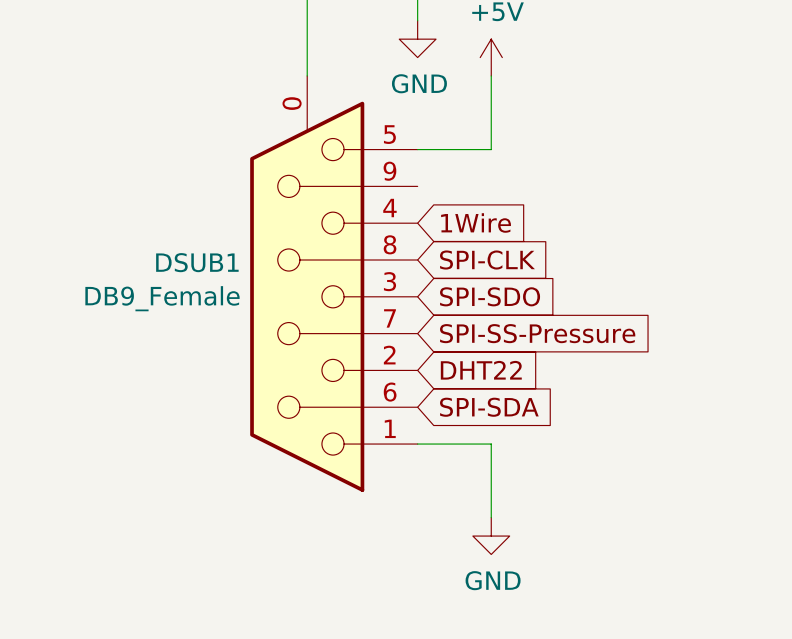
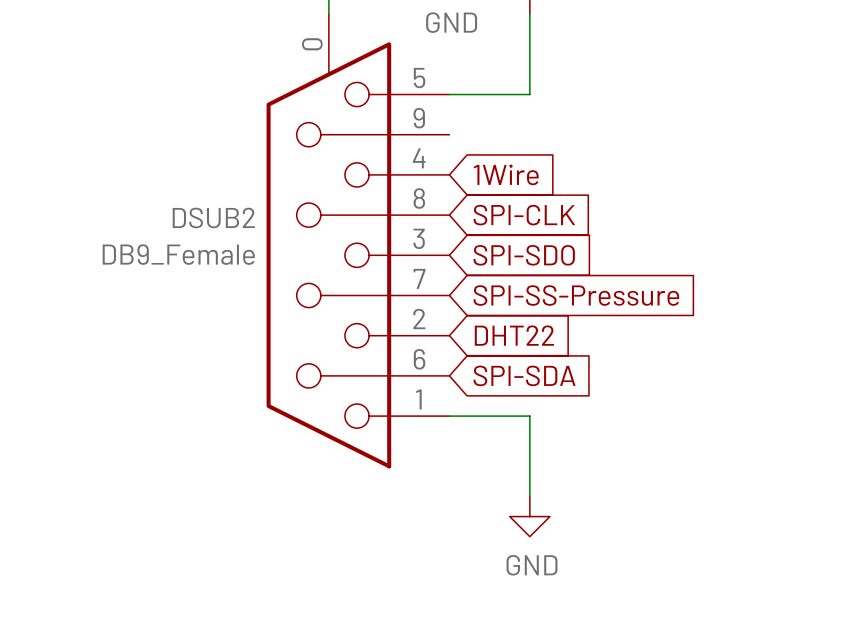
DSUB1 name: DSUB1 (197, 262) -> DSUB2 (213, 217)

